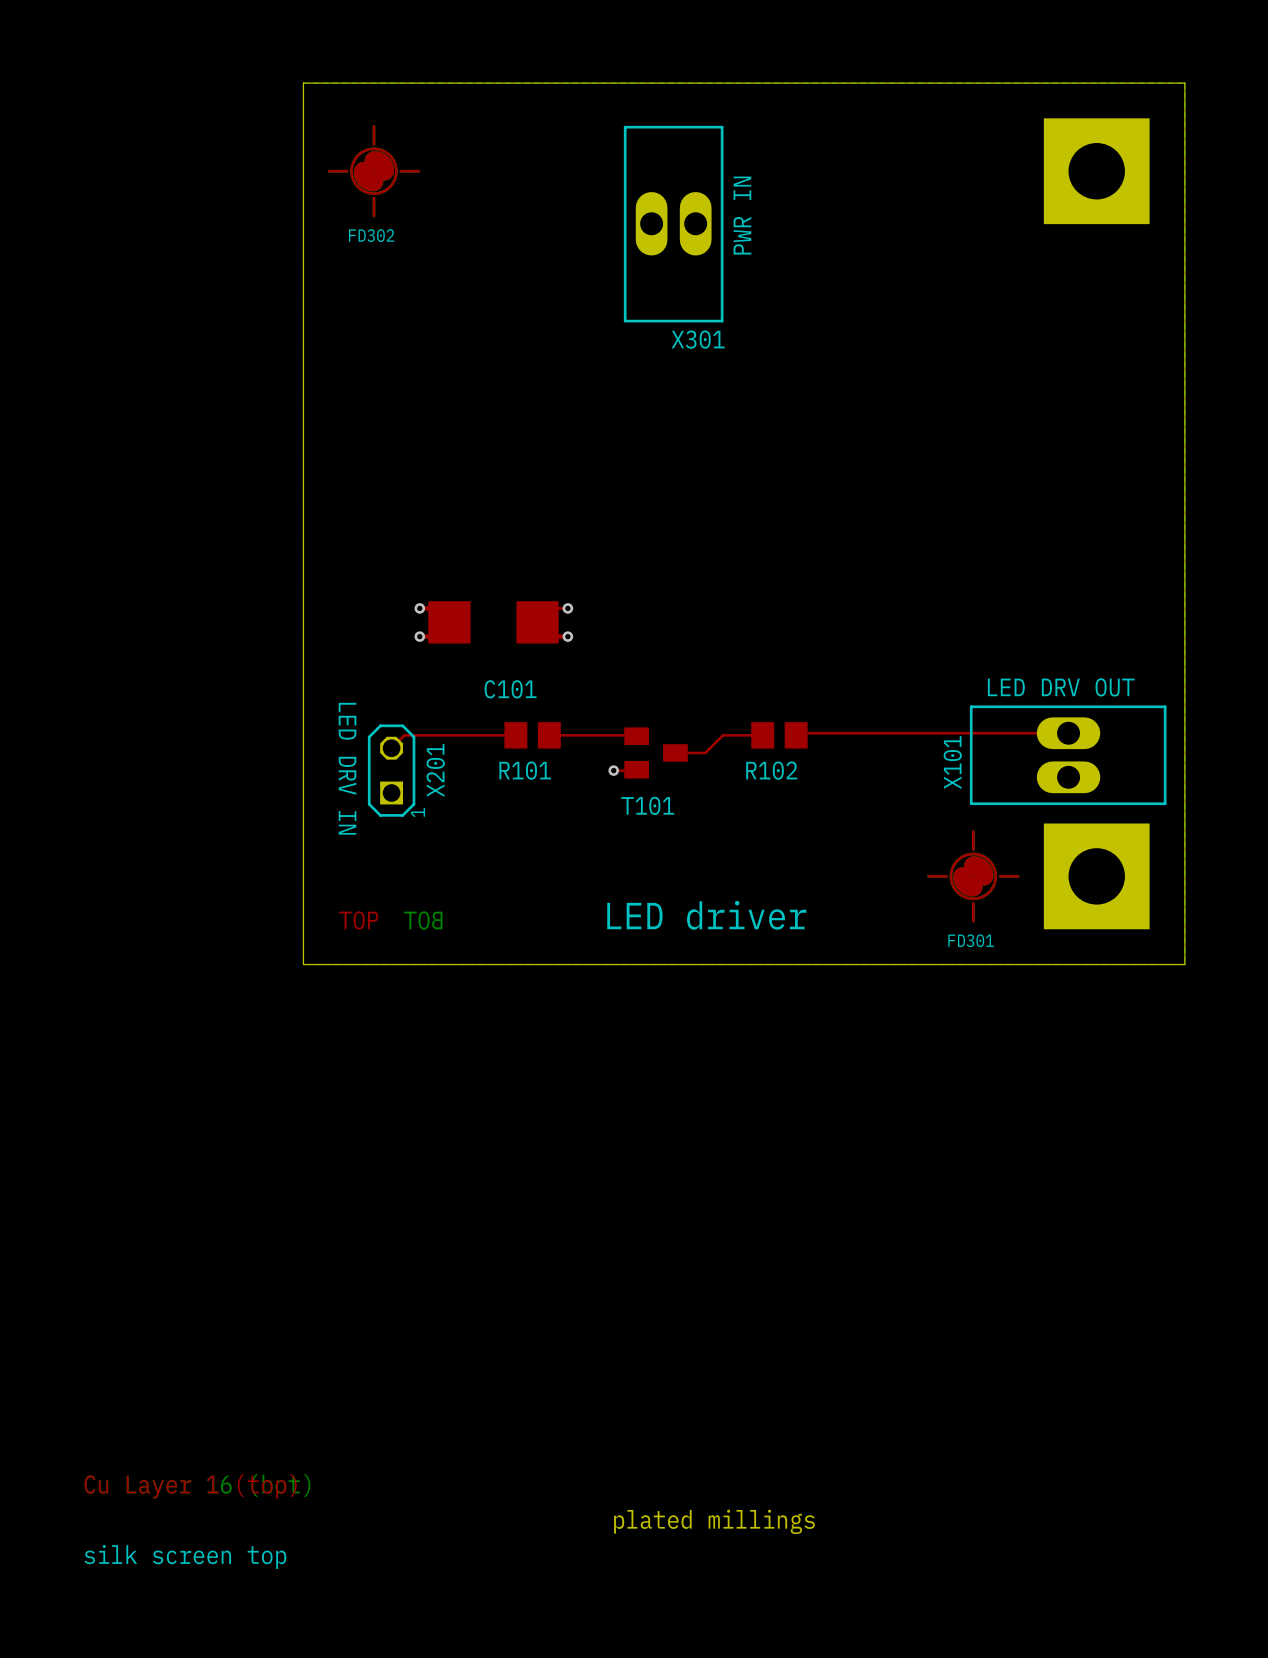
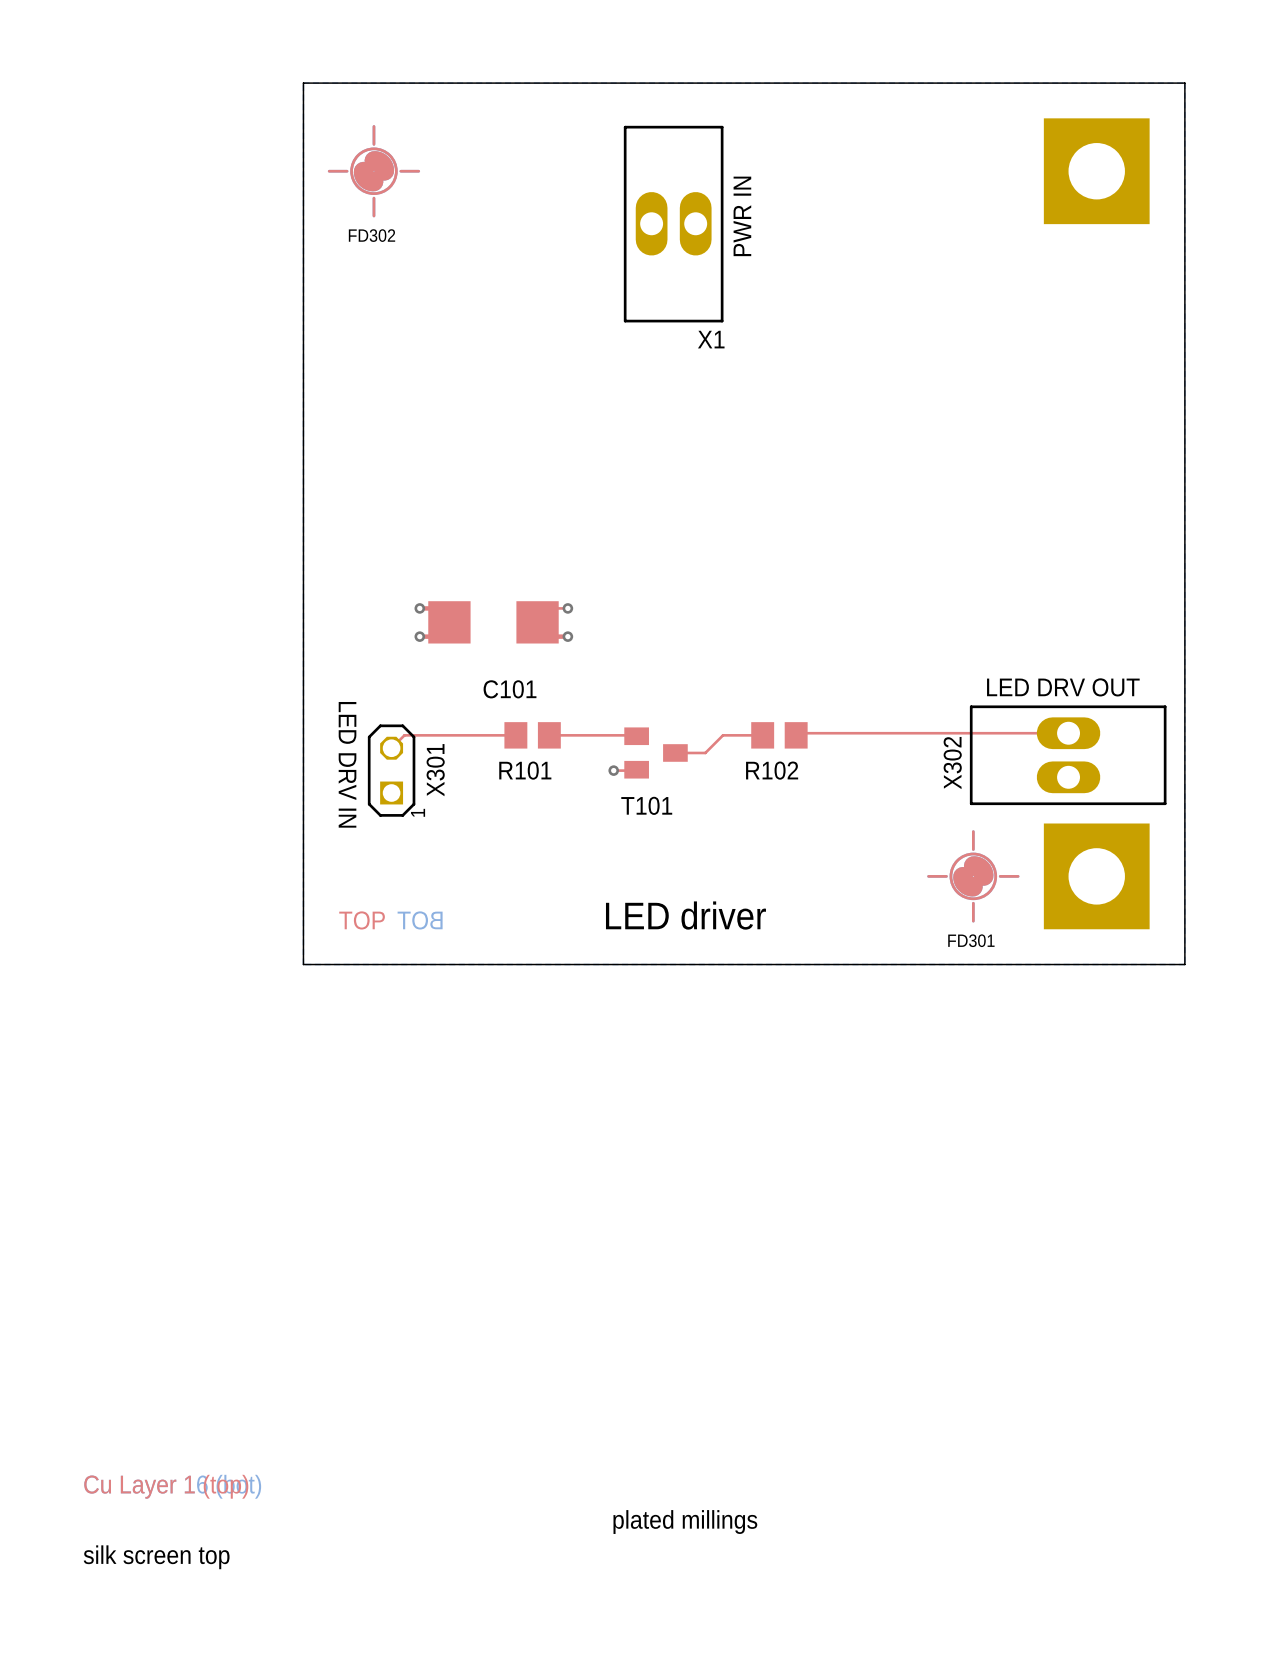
X301 name: X301 (698, 339) -> X1 (711, 339)
X101 name: X101 (952, 762) -> X302 (952, 763)
X201 name: X201 (435, 770) -> X301 (435, 770)

